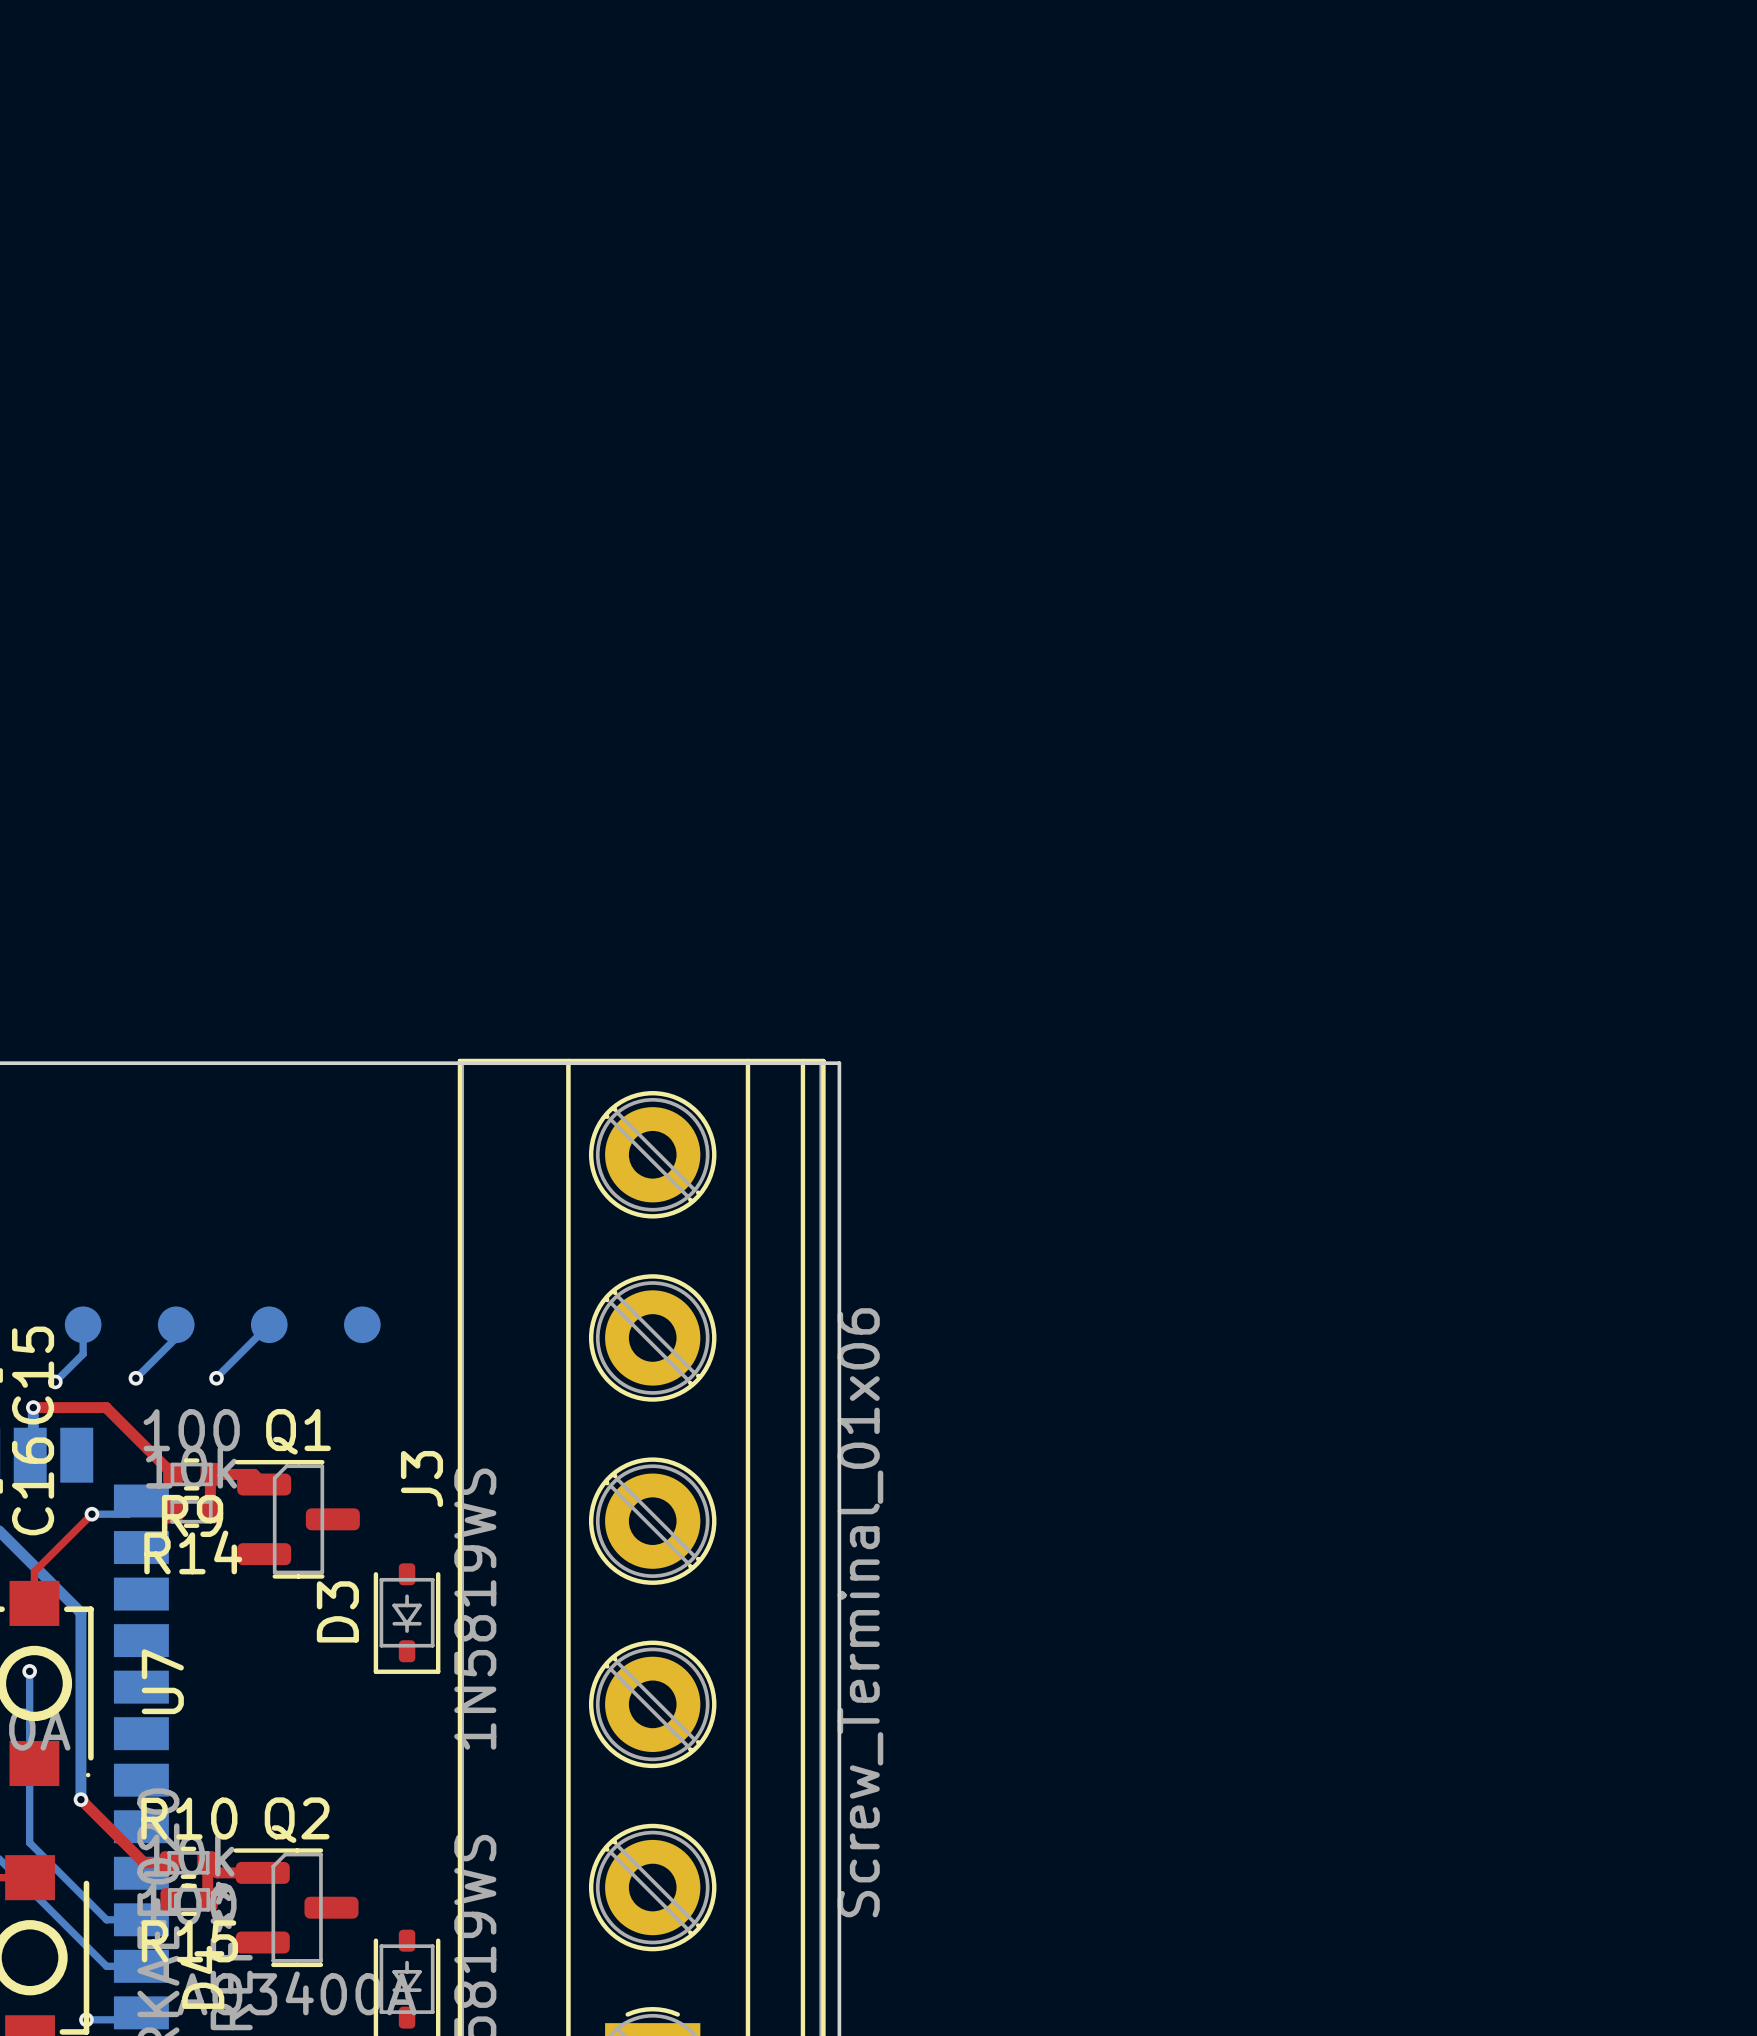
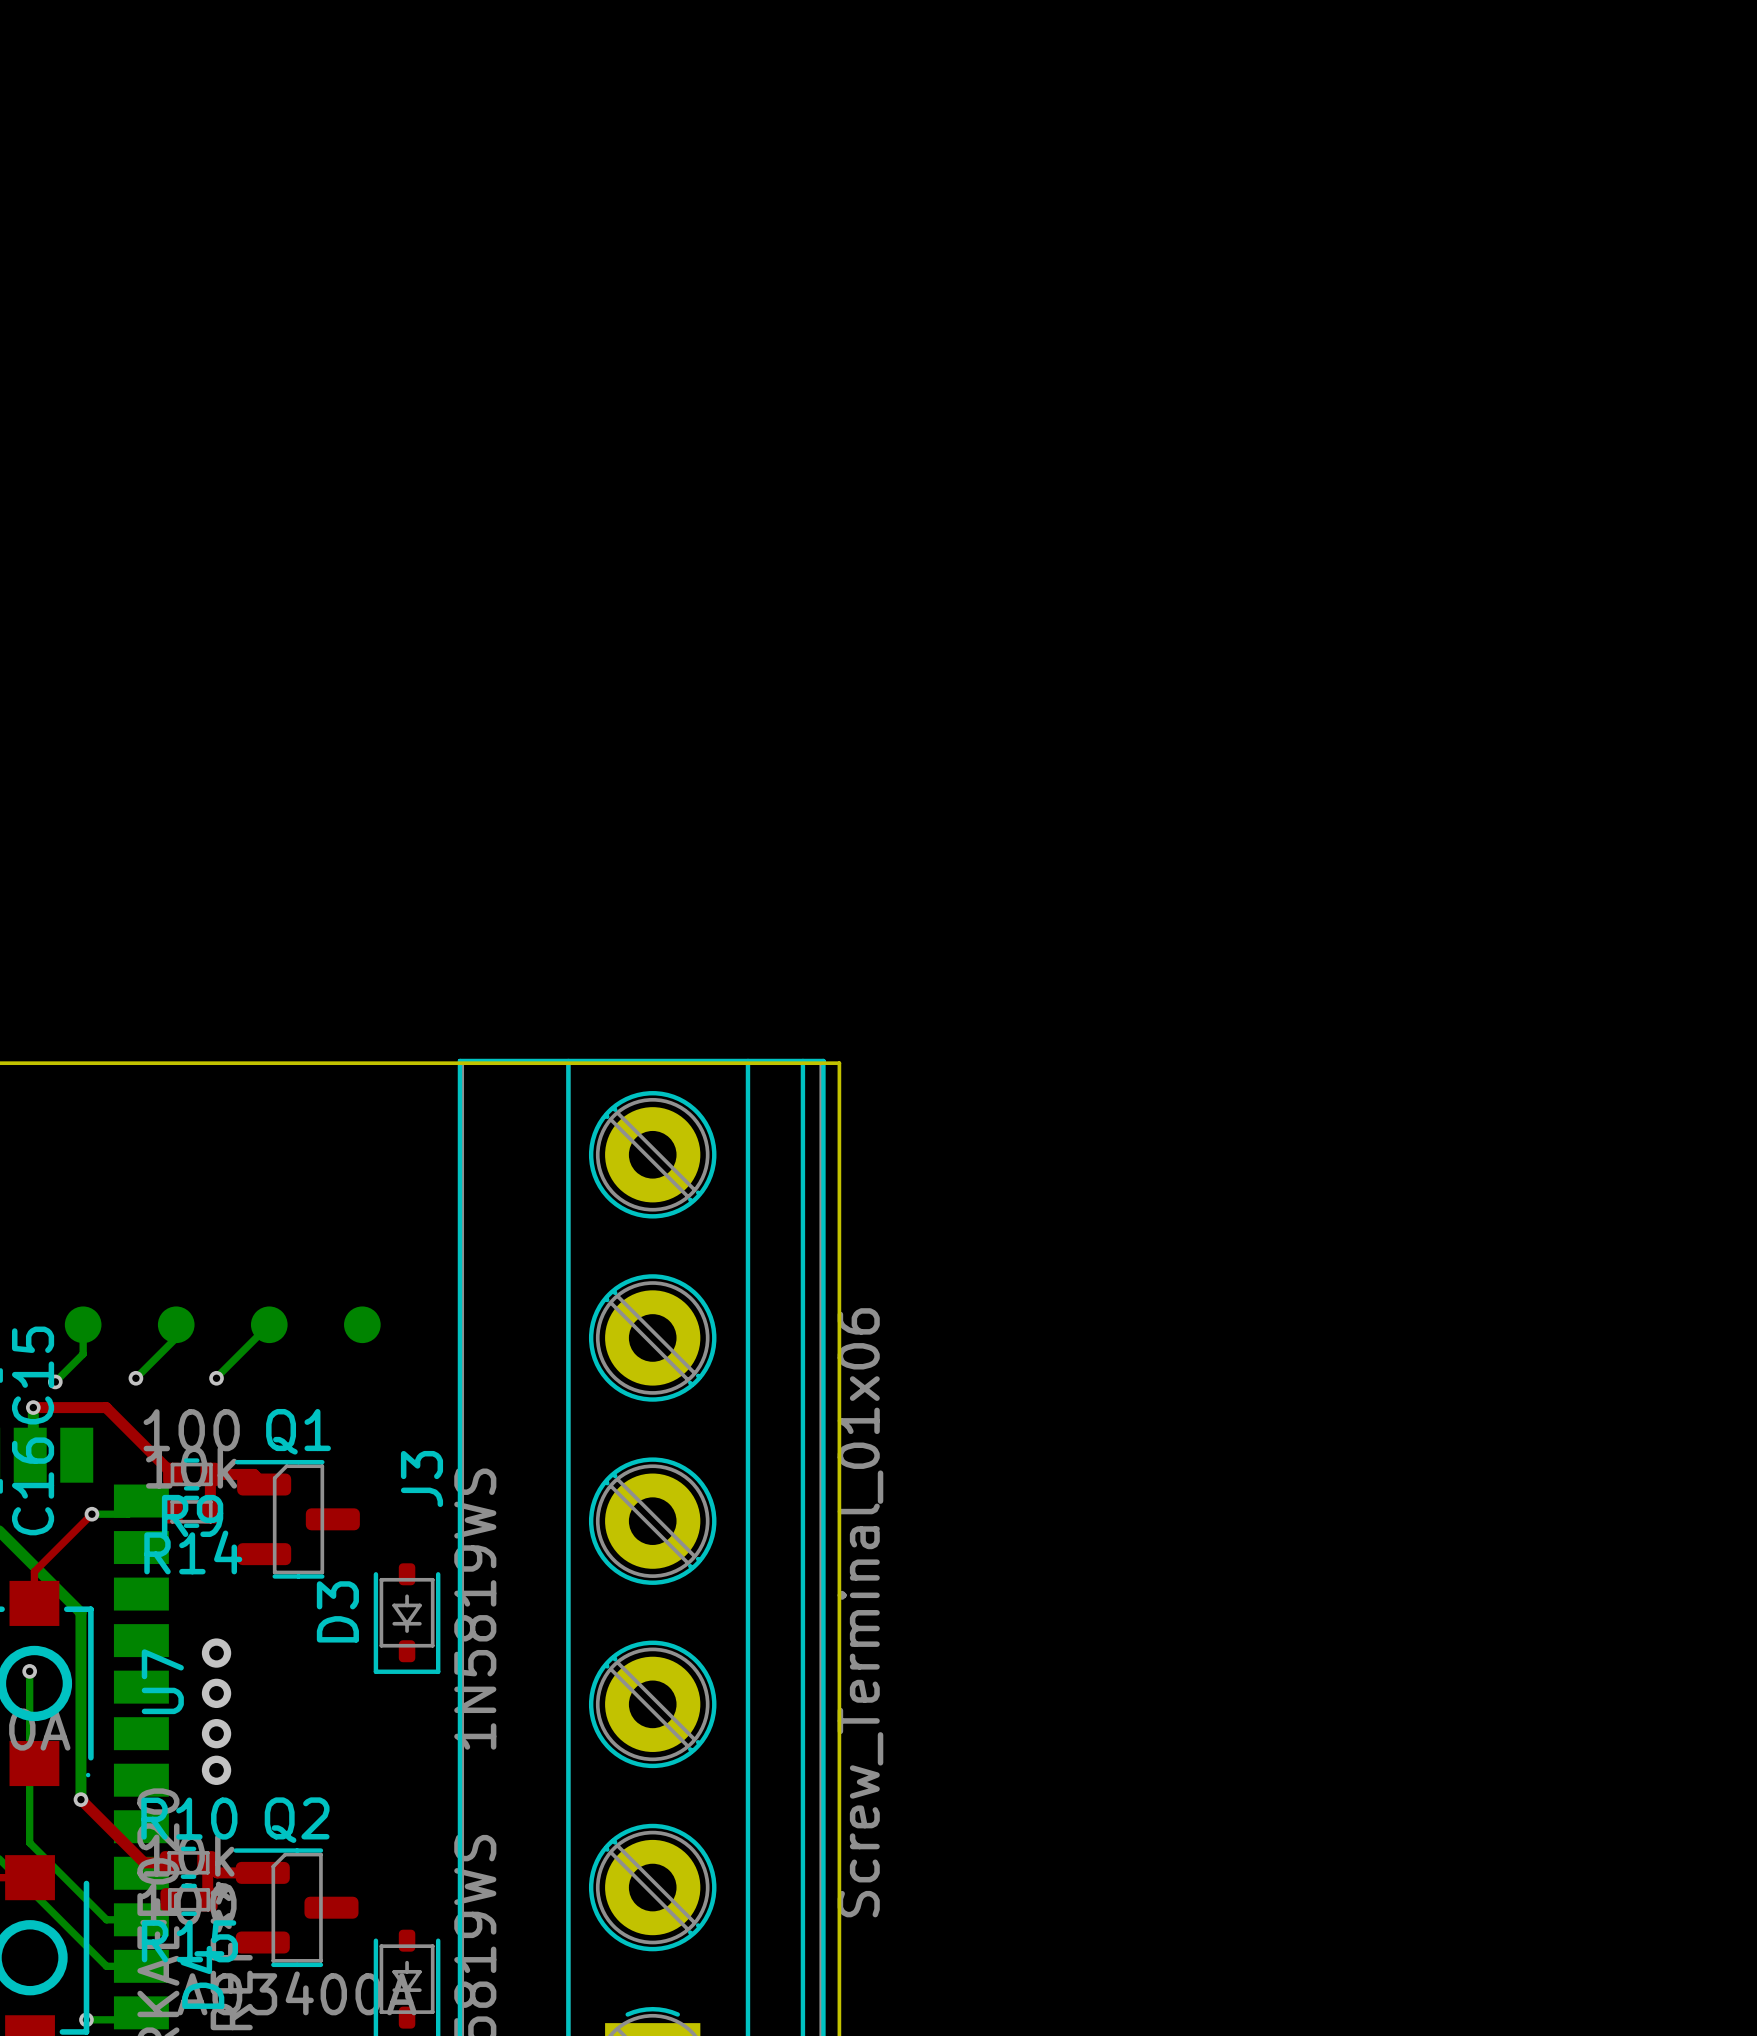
via: none -> (216, 1653)
via: none -> (216, 1693)
via: none -> (216, 1733)
via: none -> (216, 1770)

